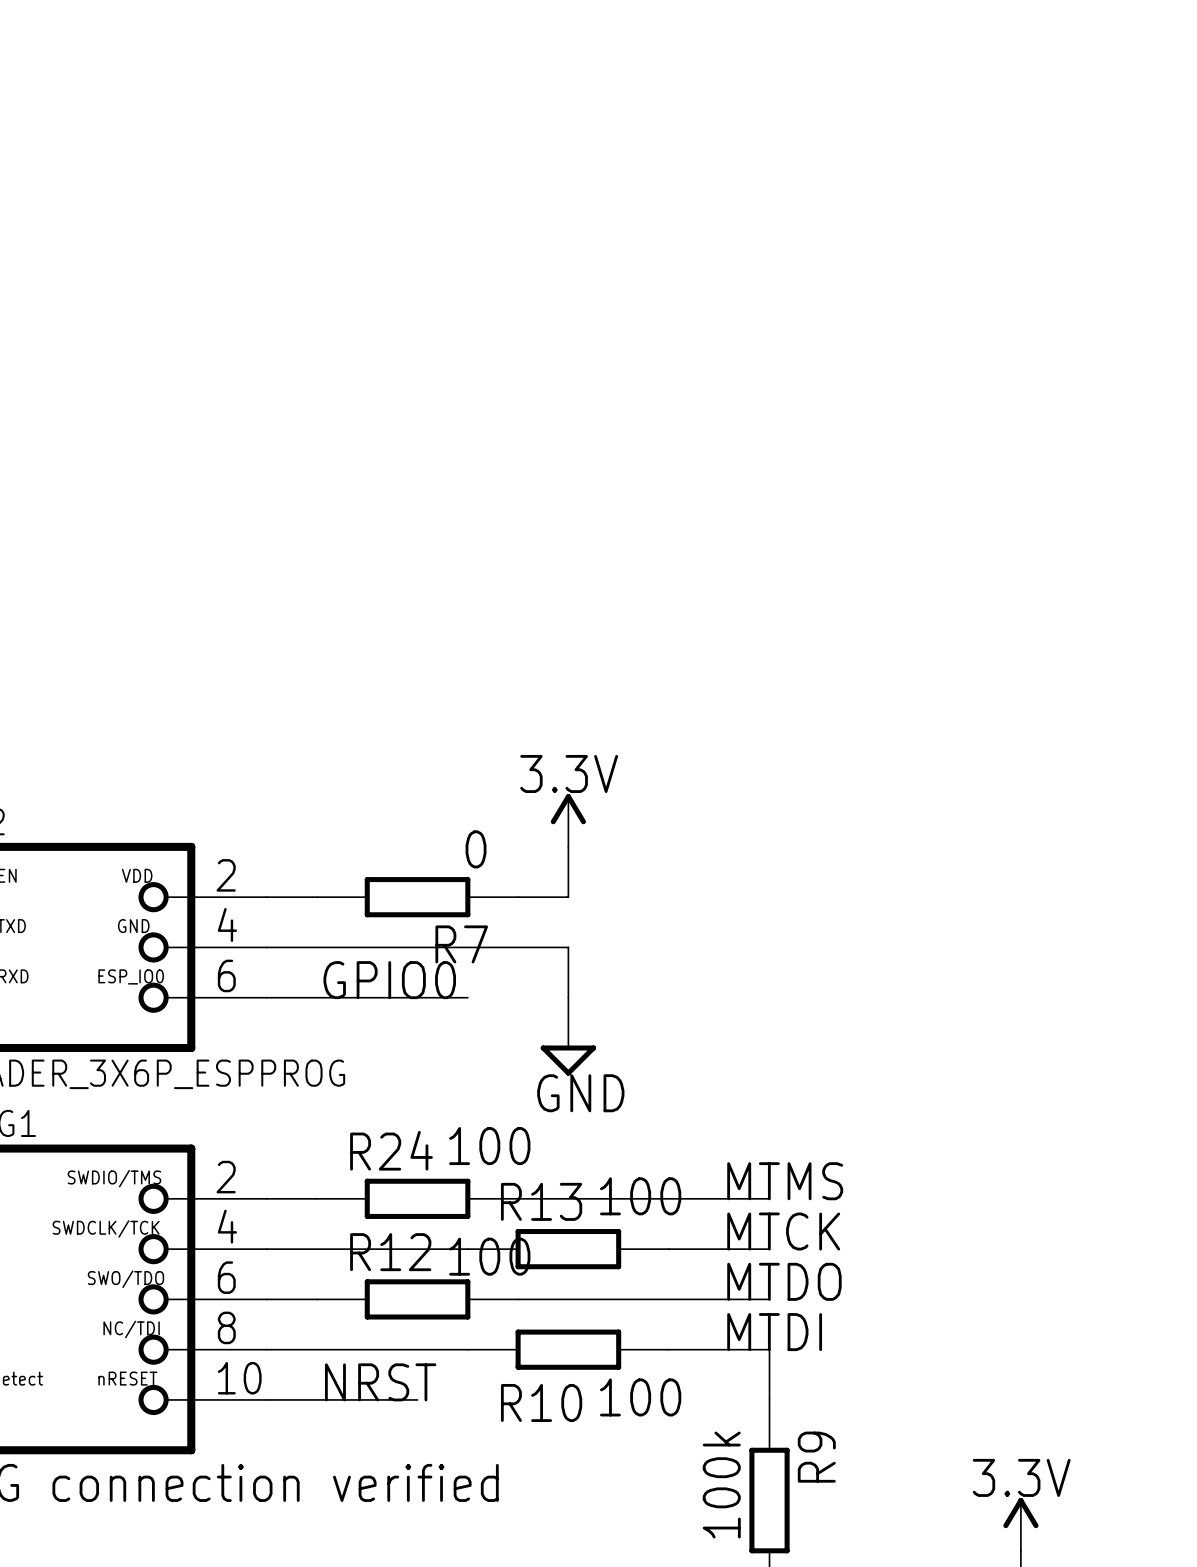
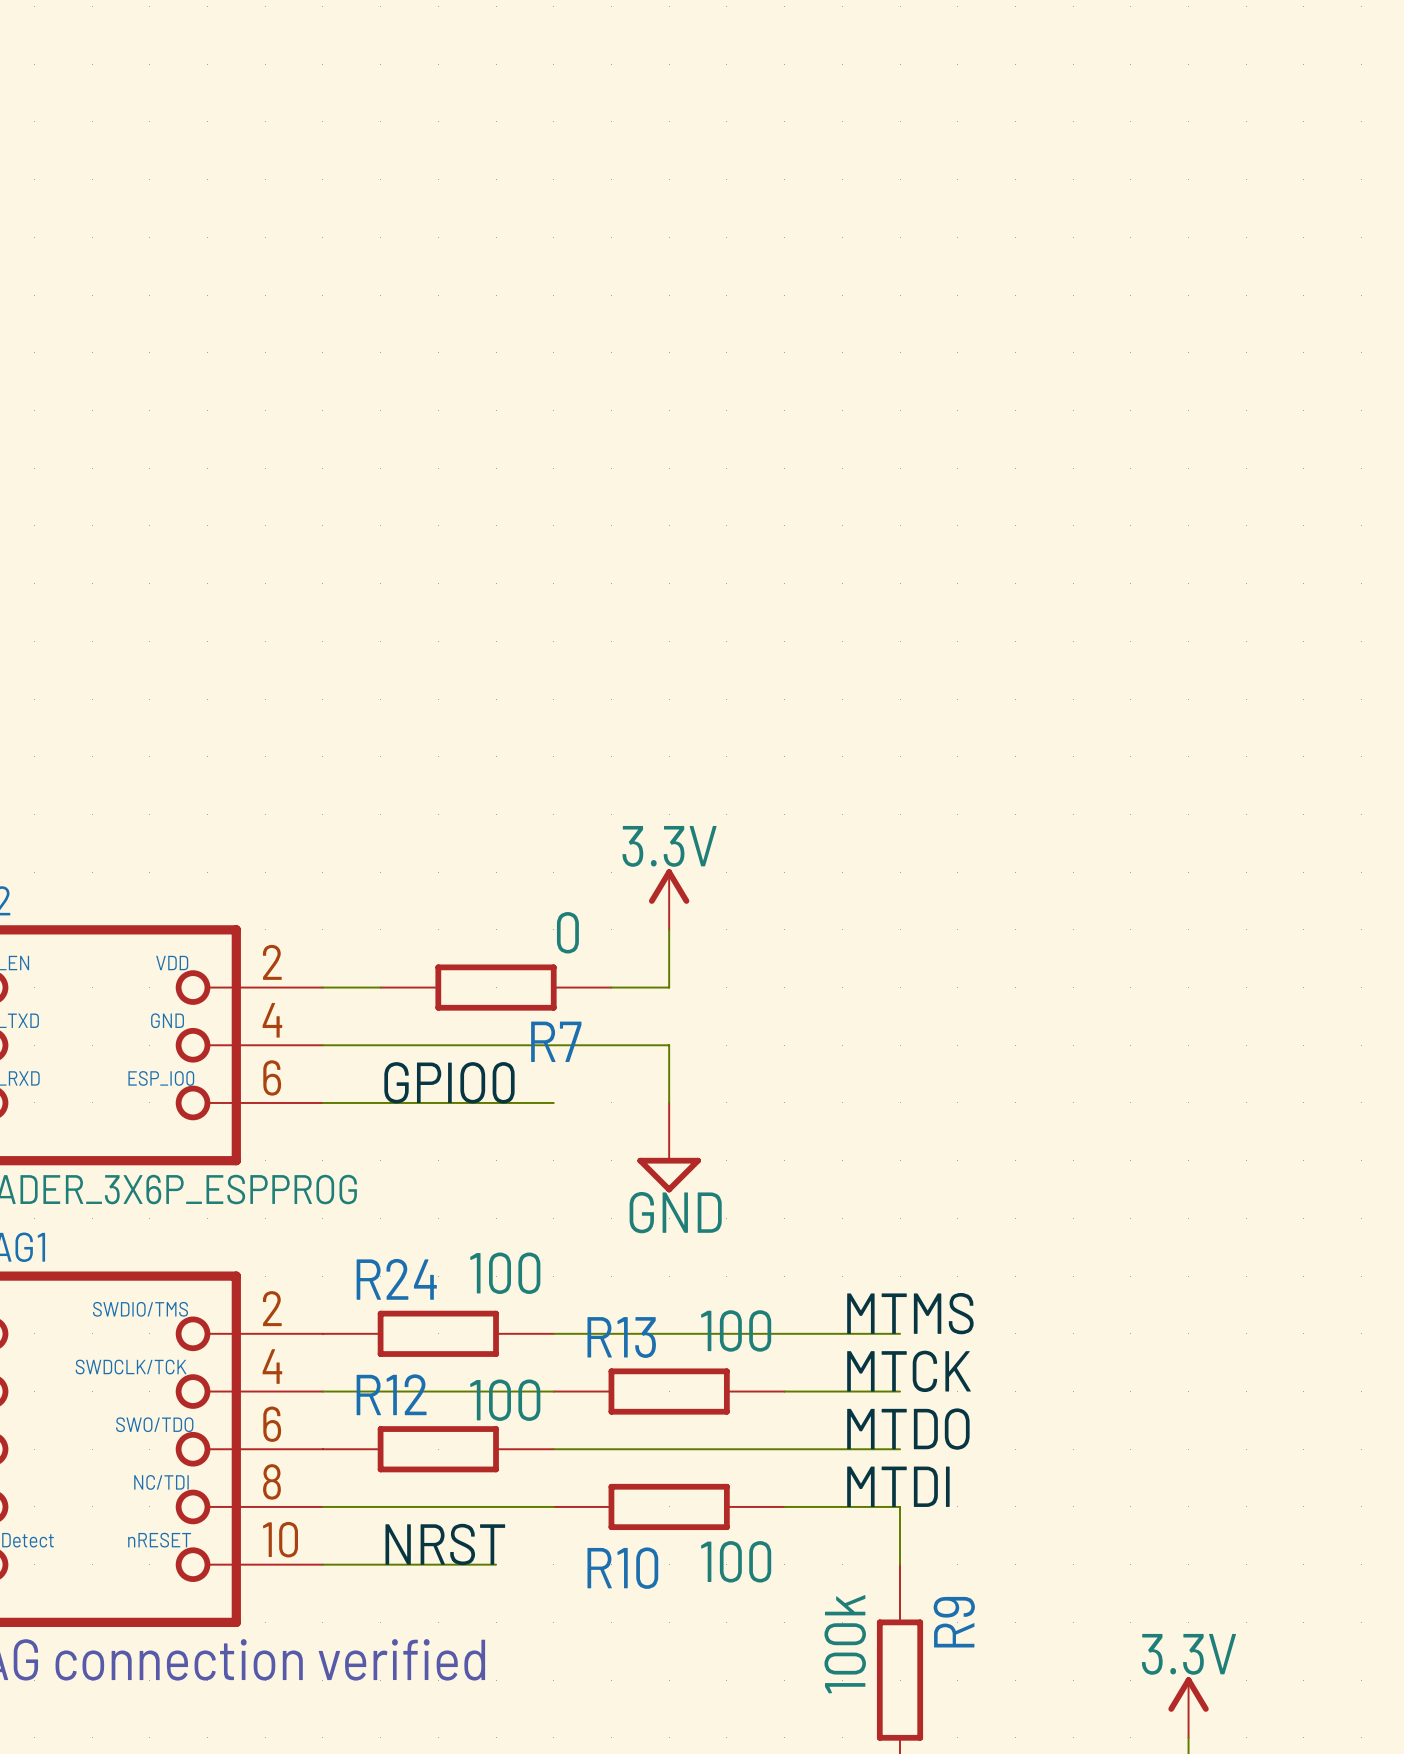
R24 position: (417, 1198) -> (438, 1333)
R12 position: (417, 1299) -> (438, 1449)

